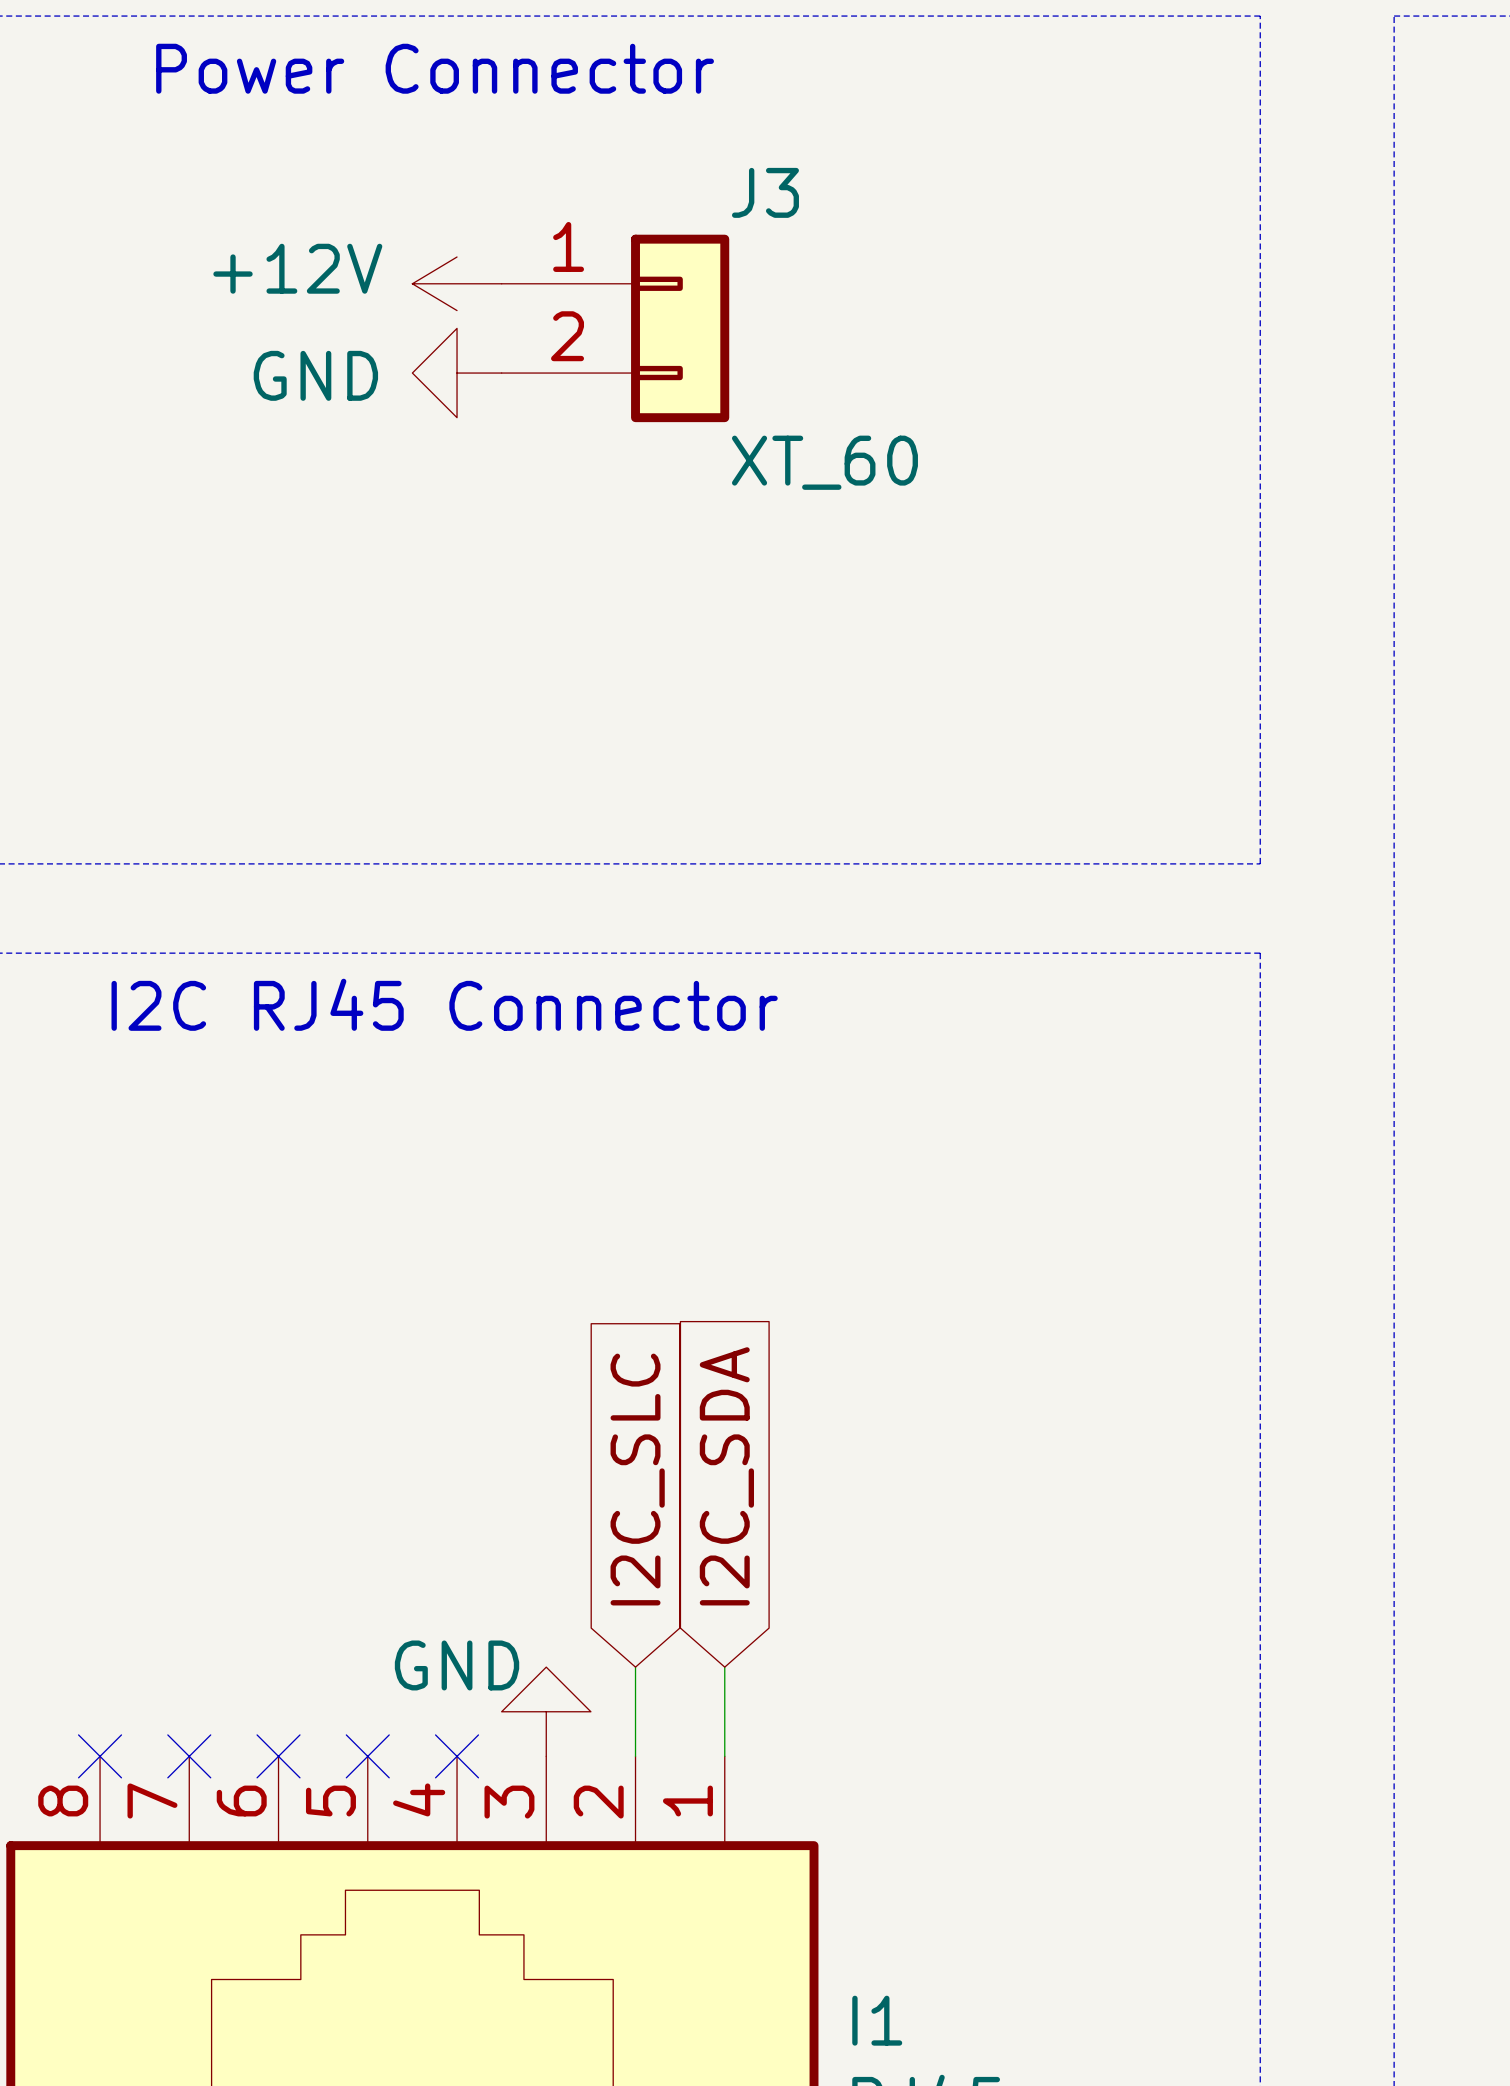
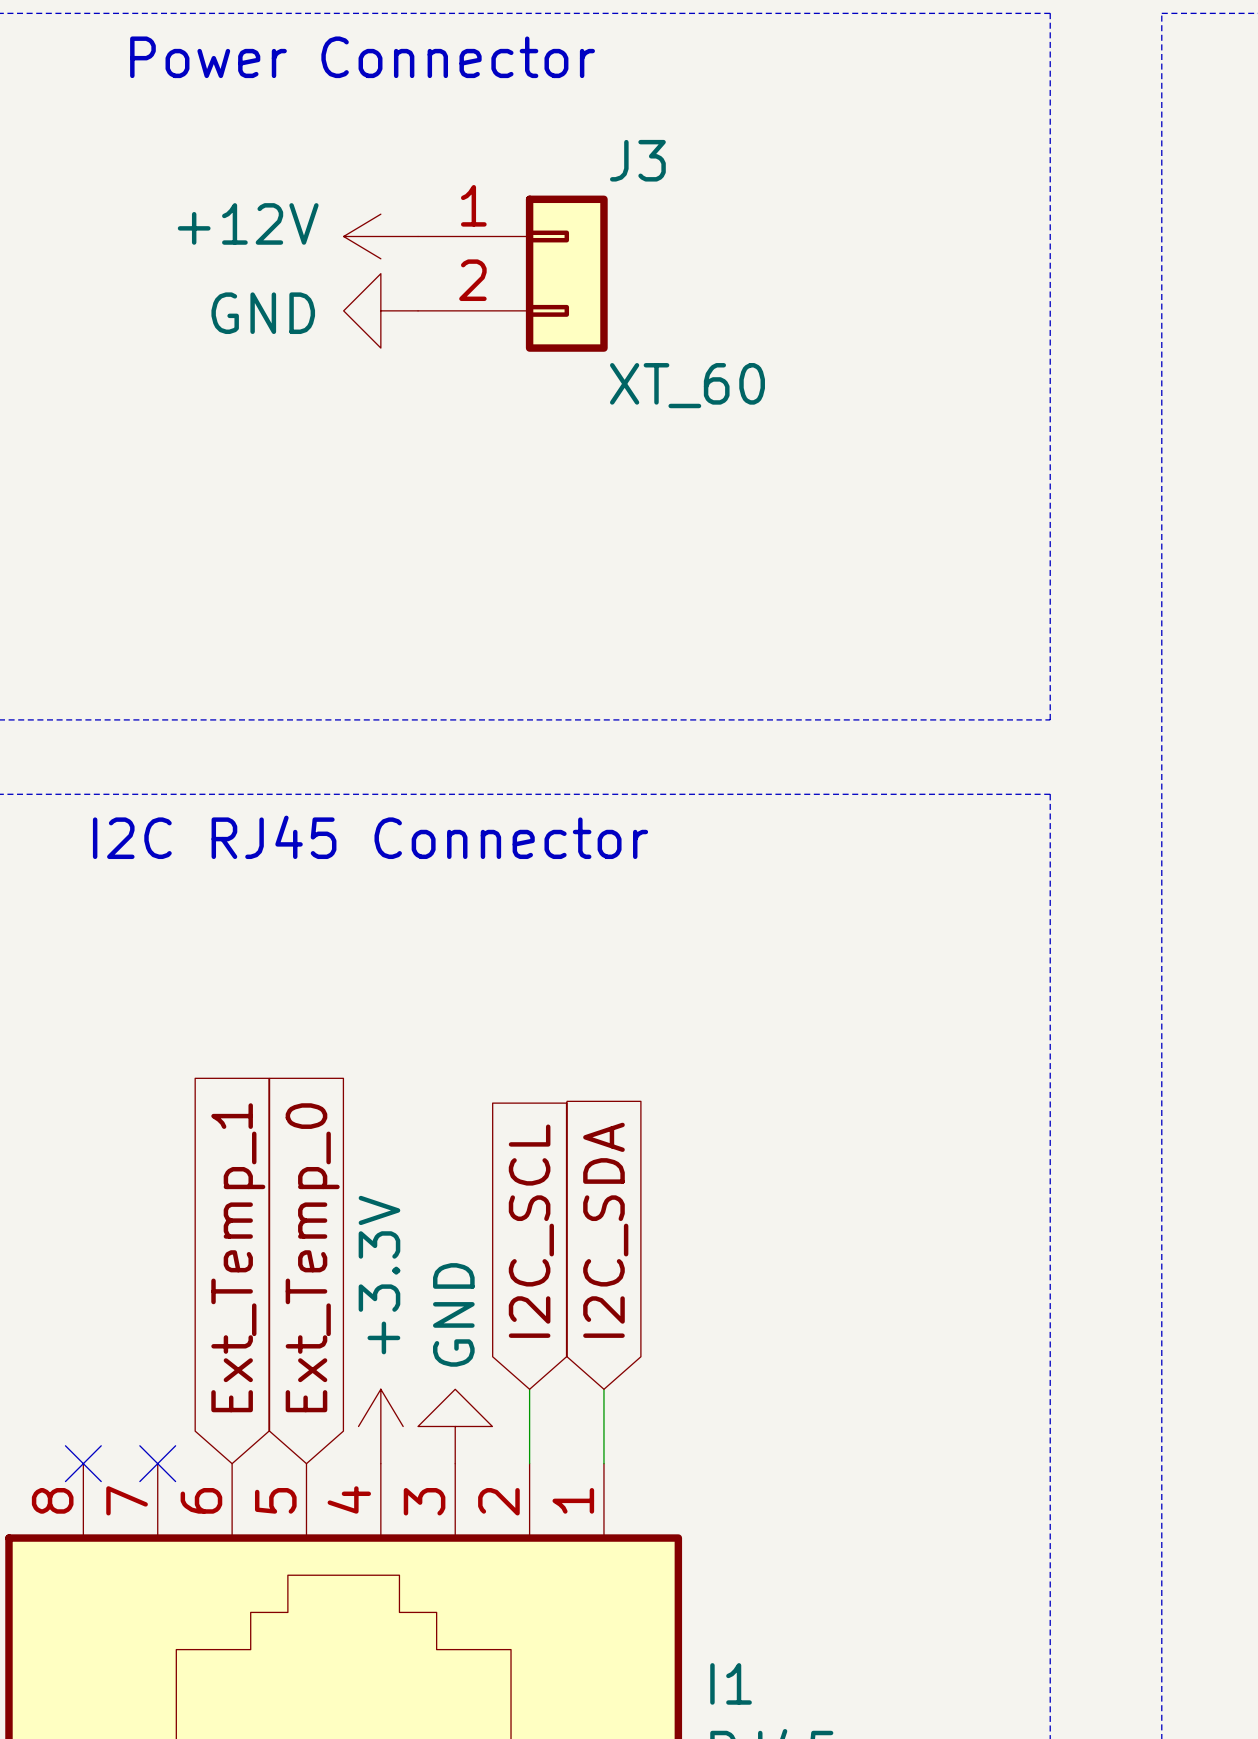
global label: I2C_SLC (637, 1479) -> I2C_SCL (531, 1231)
global label: none -> Ext_Temp_1 (238, 1257)
global label: none -> Ext_Temp_0 (312, 1257)
power symbol text rotation: 0° (457, 1665) -> 90° counterclockwise (453, 1314)
power symbol: none -> +3.3V (380, 1426)
no-connect mark: (278, 1756) -> none
no-connect mark: (367, 1756) -> none
no-connect mark: (457, 1756) -> none

